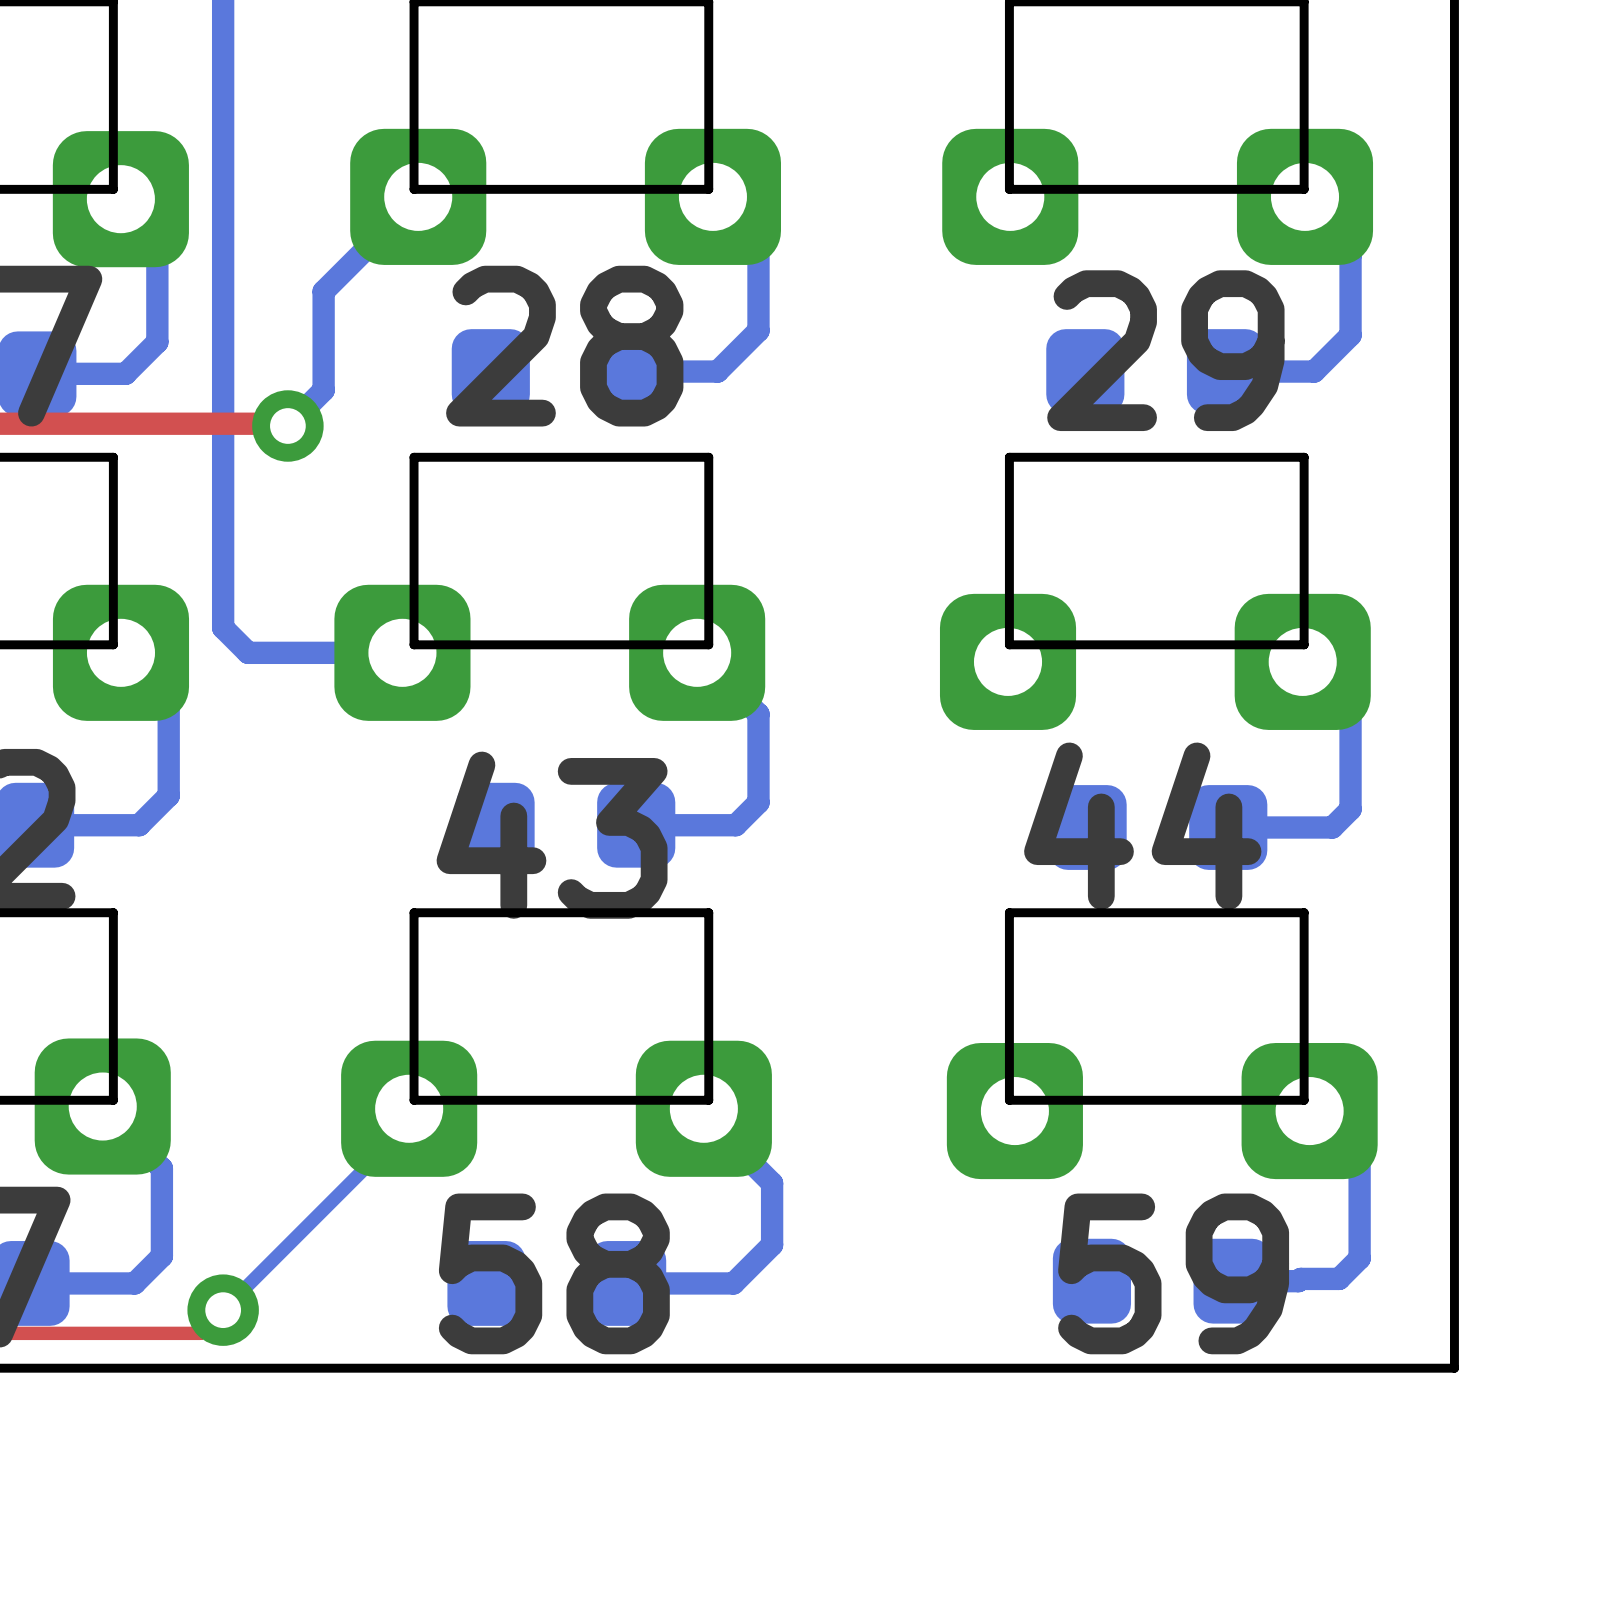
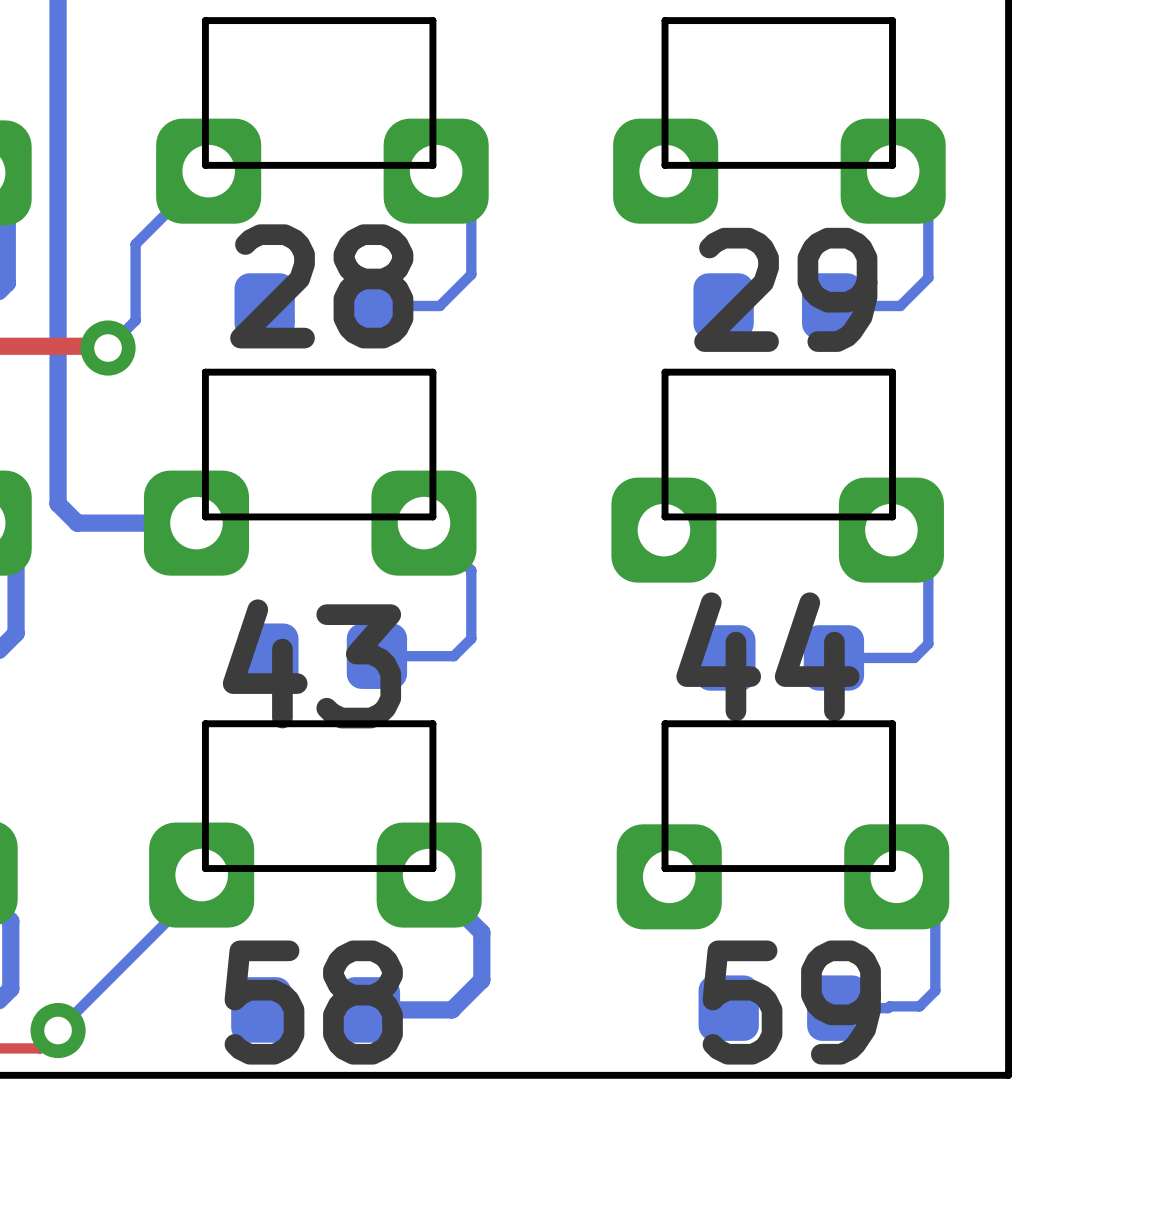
bottom track width: thick (730, 214) (758, 242) (758, 330) (717, 371) (631, 371) -> thin (449, 184) (471, 206) (471, 274) (439, 306) (373, 306)
bottom track width: thick (396, 218) (323, 291) (323, 390) (287, 426) -> thin (191, 188) (135, 244) (135, 320) (108, 348)
bottom track width: thick (1304, 222) (1318, 222) (1350, 255) (1350, 335) (1314, 371) (1239, 371) -> thin (893, 191) (903, 191) (928, 216) (928, 277) (900, 306) (842, 306)
bottom track width: thick (722, 678) (758, 714) (758, 802) (735, 825) (636, 825) -> thin (443, 542) (471, 570) (471, 638) (453, 656) (376, 656)
bottom track width: thick (1302, 678) (1318, 678) (1350, 710) (1350, 809) (1332, 827) (1241, 827) -> thin (891, 542) (903, 542) (928, 567) (928, 643) (914, 657) (844, 657)
bottom track width: thick (1325, 1126) (1359, 1161) (1359, 1258) (1339, 1278) (1245, 1281) -> thin (908, 888) (935, 915) (935, 990) (919, 1006) (847, 1008)

